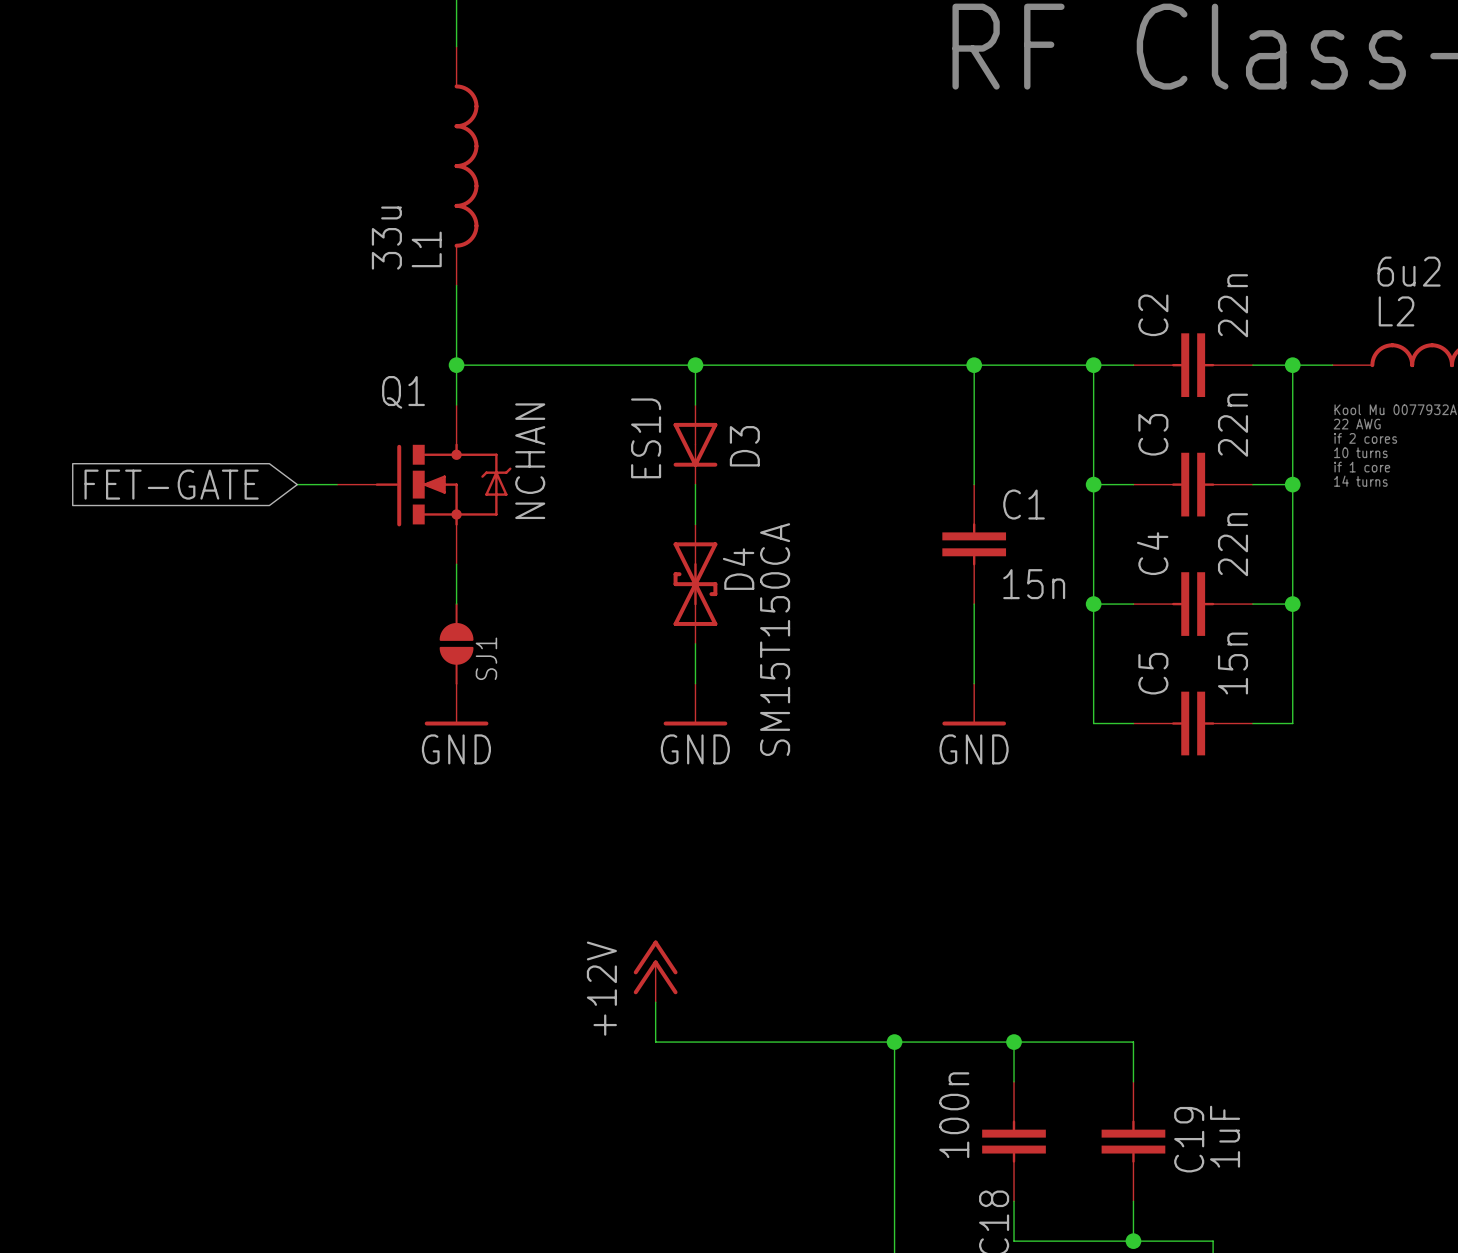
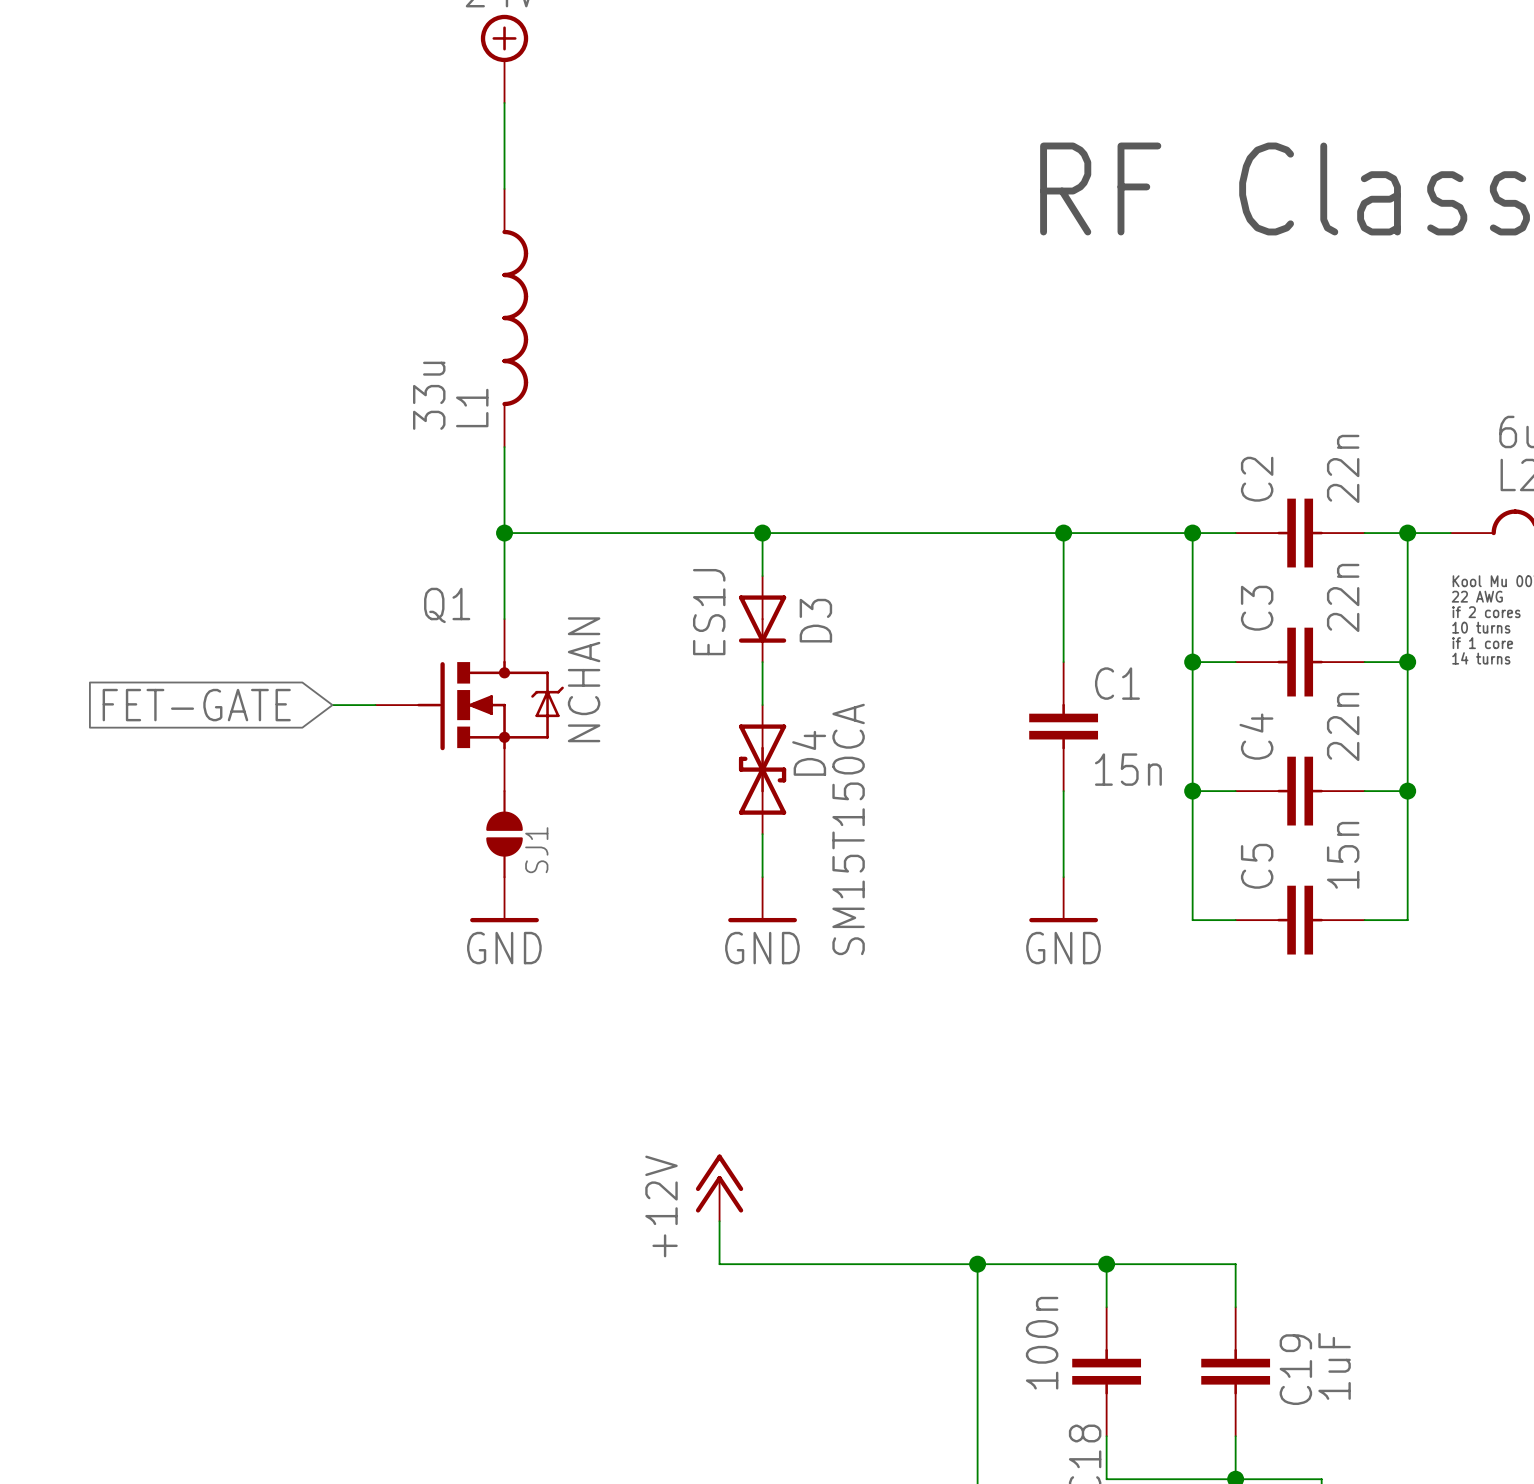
global label position: FET-GATE (171, 484) -> FET-GATE (196, 705)
wire: (297, 484) (337, 484) -> (332, 705) (375, 705)
Q1 position: (424, 484) -> (469, 705)

